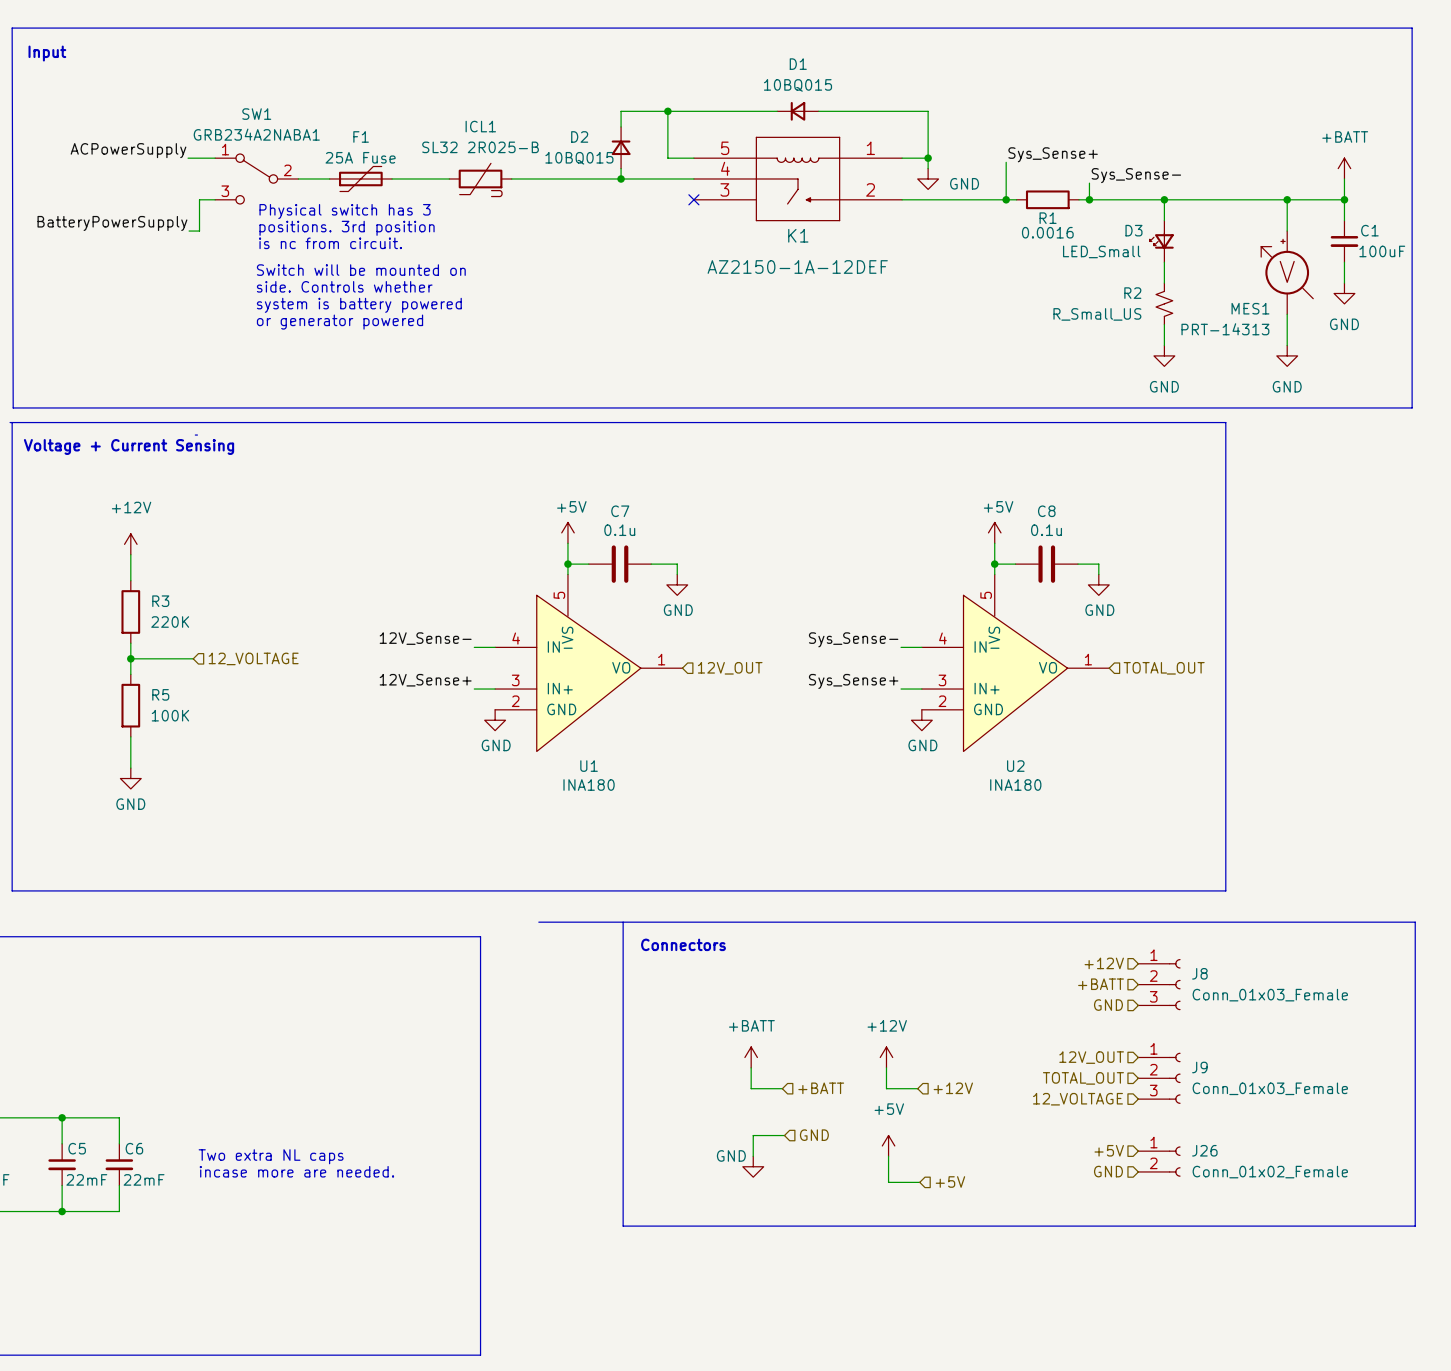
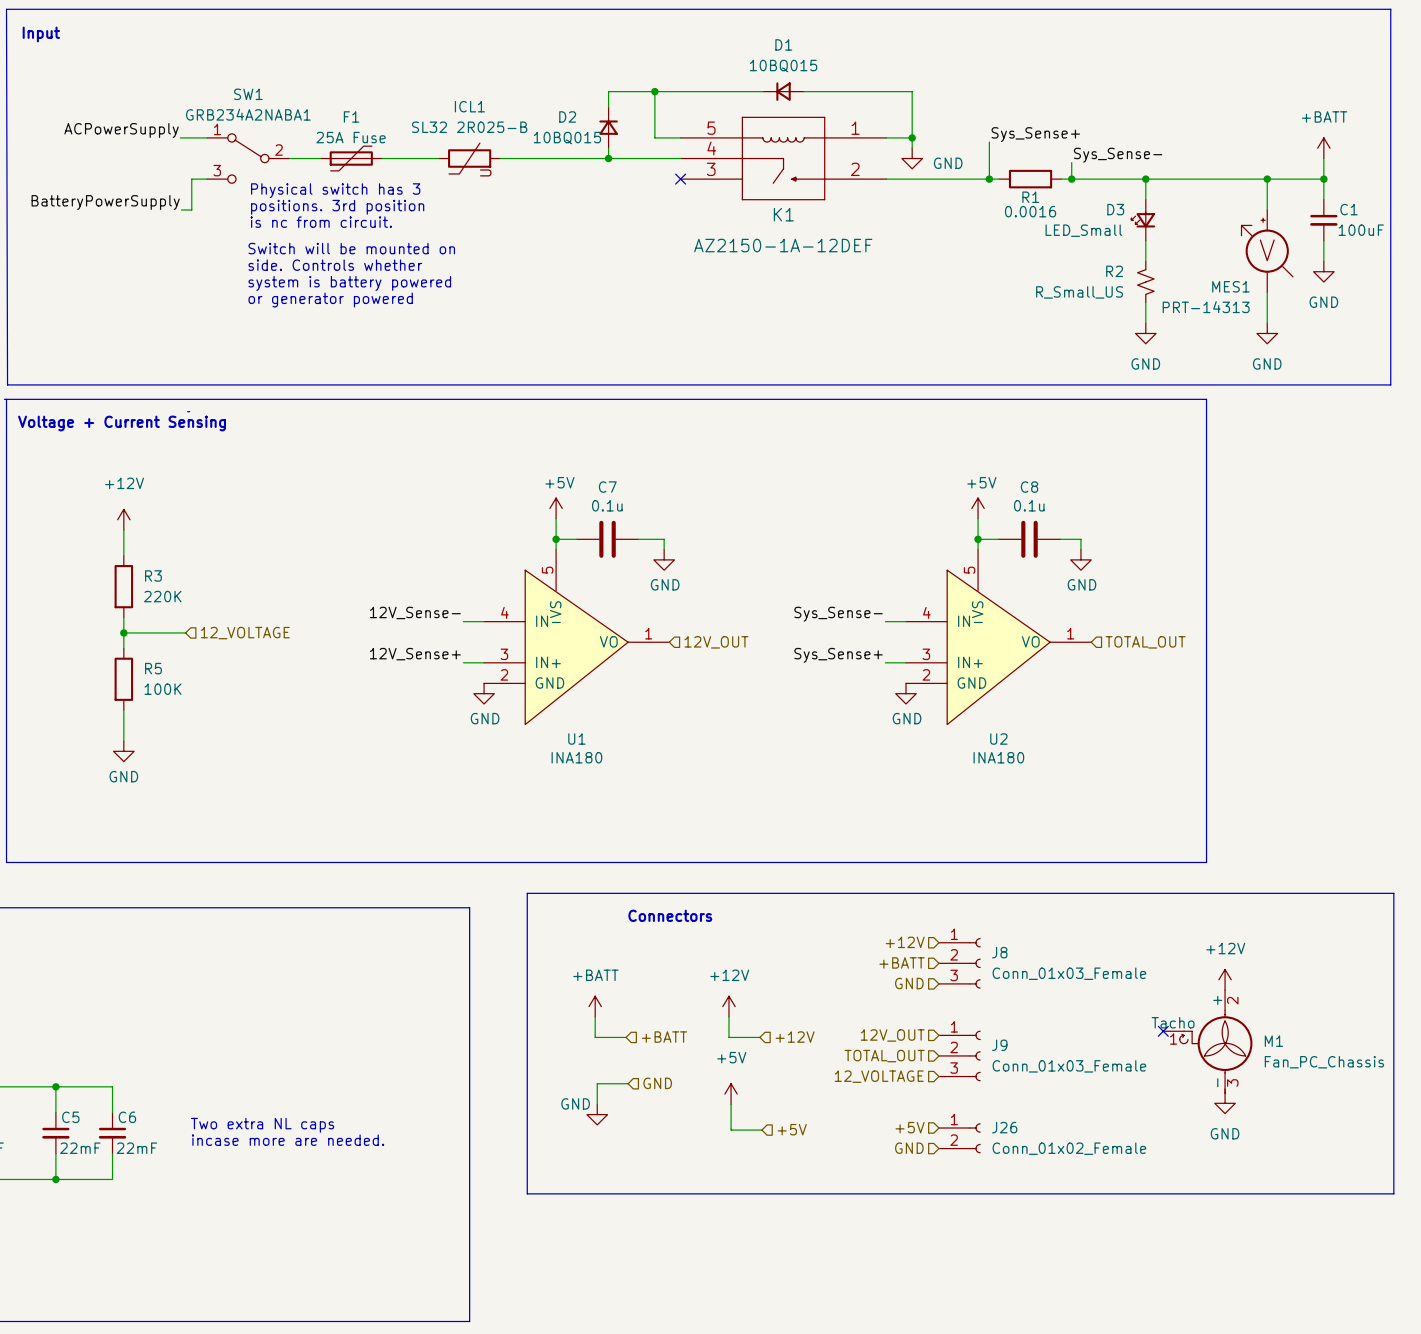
line: (623, 922) (623, 1226) -> (527, 893) (527, 1193) (610, 1193)
hierarchical label: +12V (1104, 963) -> none
hierarchical label: none -> +12V (905, 942)
hierarchical label: +BATT (1101, 984) -> none
J8 position: (1159, 984) -> (959, 963)
hierarchical label: none -> +BATT (902, 962)
hierarchical label: GND (1108, 1005) -> none
power symbol: none -> +12V (1225, 979)
hierarchical label: none -> GND (909, 983)
power symbol position: +BATT (751, 1057) -> +BATT (595, 1006)
power symbol position: +12V (886, 1057) -> +12V (728, 1006)
hierarchical label position: 12V_OUT (1091, 1057) -> 12V_OUT (892, 1035)
no-connect mark: none -> (1163, 1031)
hierarchical label: none -> +BATT (664, 1037)
wire: (751, 1067) (751, 1088) (782, 1088) -> (595, 1016) (595, 1037) (626, 1037)
hierarchical label: none -> +12V (795, 1037)
wire: (886, 1067) (886, 1088) (917, 1088) -> (728, 1016) (728, 1037) (759, 1037)
M1: none -> Fan_PC_Chassis (1207, 1041)
hierarchical label position: TOTAL_OUT (1083, 1078) -> TOTAL_OUT (884, 1056)
J9 position: (1159, 1078) -> (959, 1055)
hierarchical label: +BATT (821, 1088) -> none
hierarchical label: +12V (953, 1088) -> none
hierarchical label position: 12_VOLTAGE (1077, 1099) -> 12_VOLTAGE (879, 1076)
hierarchical label: none -> GND (657, 1083)
power symbol: none -> GND (1225, 1103)
wire: (784, 1135) (753, 1135) (753, 1156) -> (628, 1083) (597, 1083) (597, 1104)
hierarchical label: GND (814, 1135) -> none
power symbol position: +5V (888, 1145) -> +5V (731, 1094)
hierarchical label: +5V (1109, 1150) -> none
wire: (888, 1156) (888, 1182) (919, 1182) -> (731, 1104) (731, 1130) (761, 1130)
hierarchical label: none -> +5V (792, 1129)
J26 position: (1159, 1161) -> (959, 1138)
power symbol position: GND (753, 1166) -> GND (597, 1114)
hierarchical label: GND (1108, 1171) -> none
hierarchical label: none -> GND (909, 1148)
hierarchical label rotation: 0° (950, 1181) -> 180° (910, 1127)

